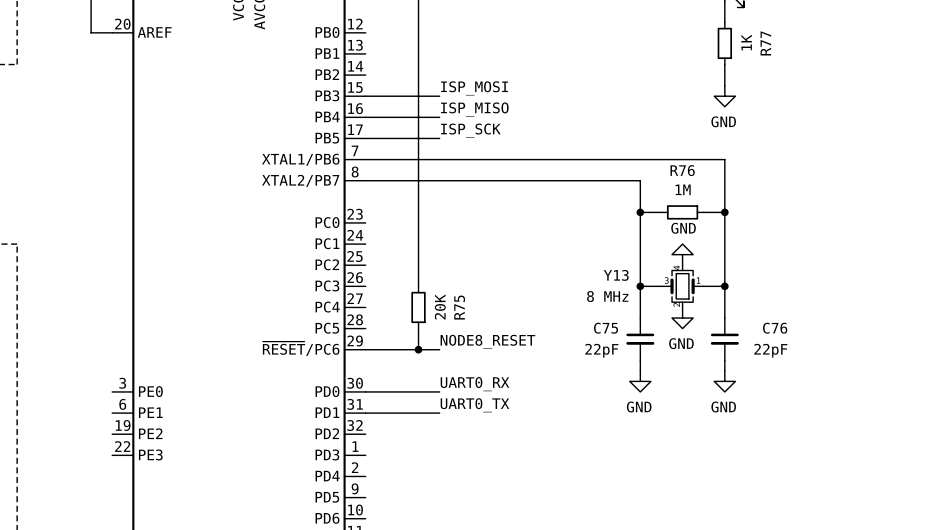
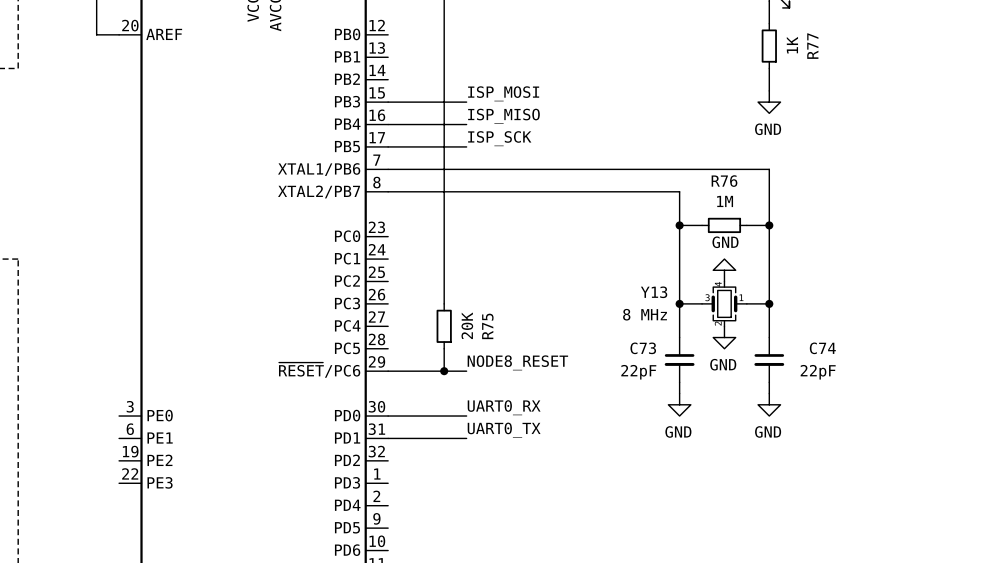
C75 name: C75 (606, 328) -> C73 (643, 348)
C76 name: C76 (775, 328) -> C74 (822, 348)

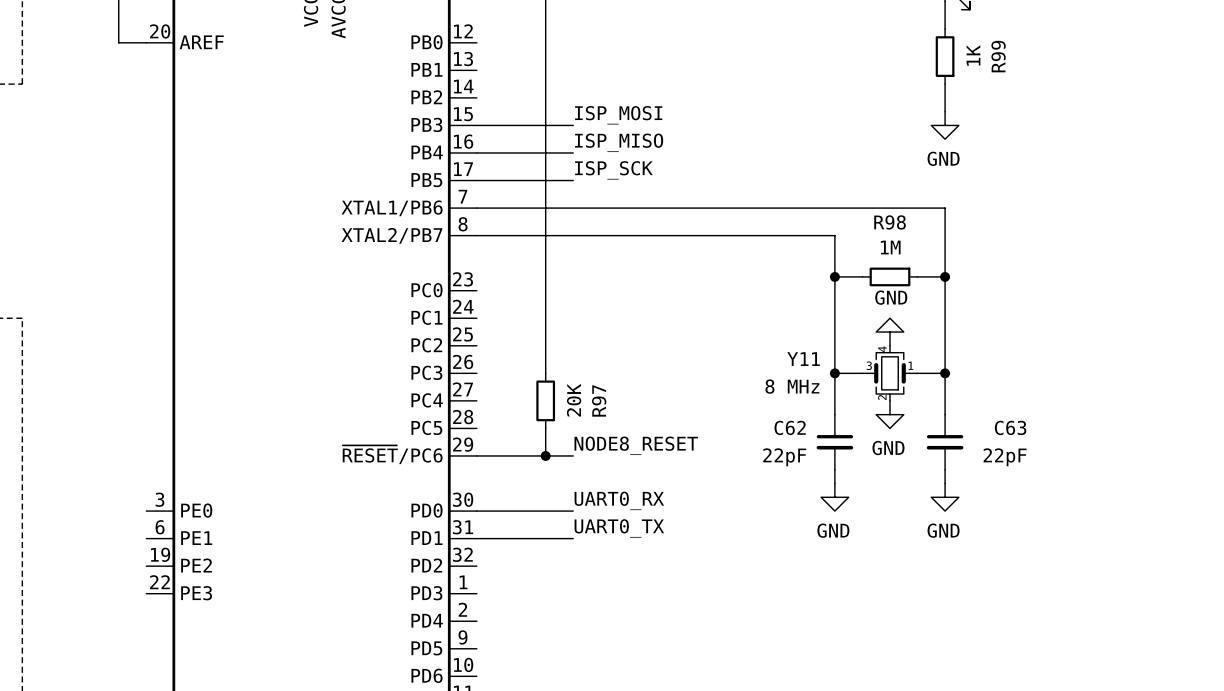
R77 name: R77 (812, 46) -> R99 (998, 56)
R76 name: R76 (724, 181) -> R98 (890, 222)
Y13 name: Y13 (654, 292) -> Y11 (803, 359)
R75 name: R75 (487, 326) -> R97 (599, 400)
C73 name: C73 (643, 348) -> C62 (790, 427)
C74 name: C74 (822, 348) -> C63 (1010, 427)

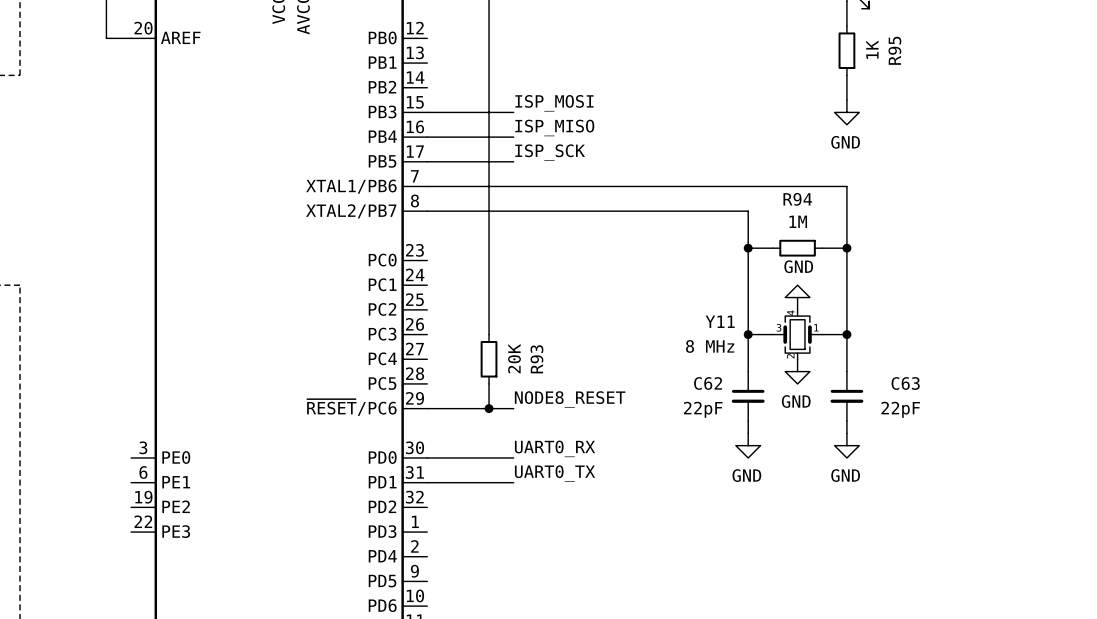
R99 name: R99 (998, 56) -> R95 (894, 50)
R98 name: R98 (890, 222) -> R94 (797, 199)
R97 name: R97 (599, 400) -> R93 (536, 359)

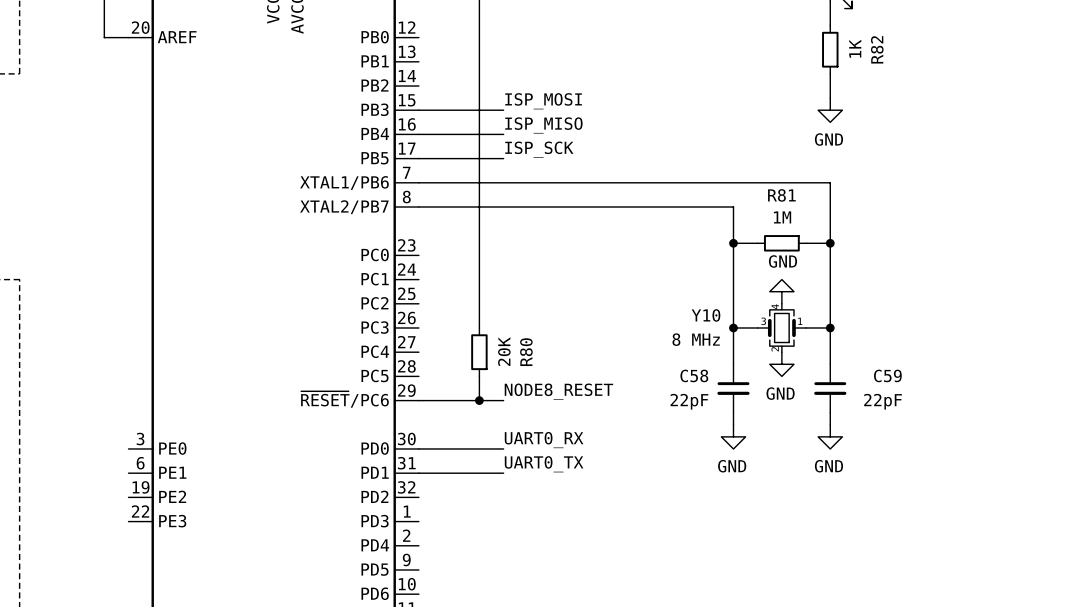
R95 name: R95 (894, 50) -> R82 (877, 49)
R94 name: R94 (797, 199) -> R81 (781, 195)
Y11 name: Y11 (720, 321) -> Y10 (706, 315)
R93 name: R93 (536, 359) -> R80 (526, 352)
C62 name: C62 (708, 383) -> C58 (694, 375)
C63 name: C63 (905, 383) -> C59 (887, 375)

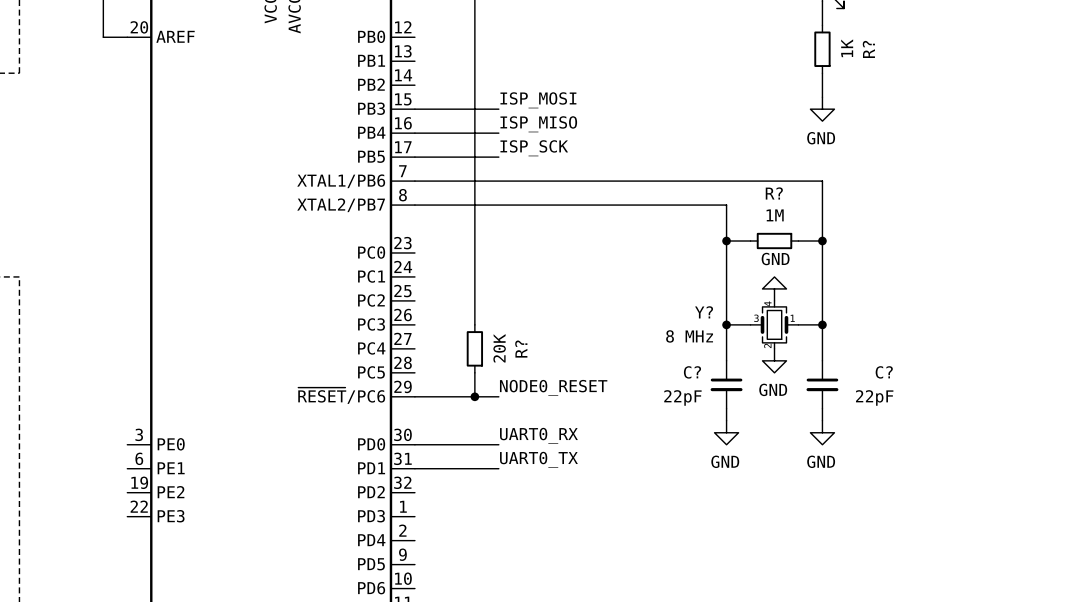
R82 name: R82 (877, 49) -> R? (868, 49)
R81 name: R81 (781, 195) -> R? (774, 193)
Y10 name: Y10 (706, 315) -> Y? (704, 312)
R80 name: R80 (526, 352) -> R? (521, 349)
C58 name: C58 (694, 375) -> C? (692, 372)
C59 name: C59 (887, 375) -> C? (884, 372)
label: NODE8_RESET (558, 391) -> NODE0_RESET (553, 387)

